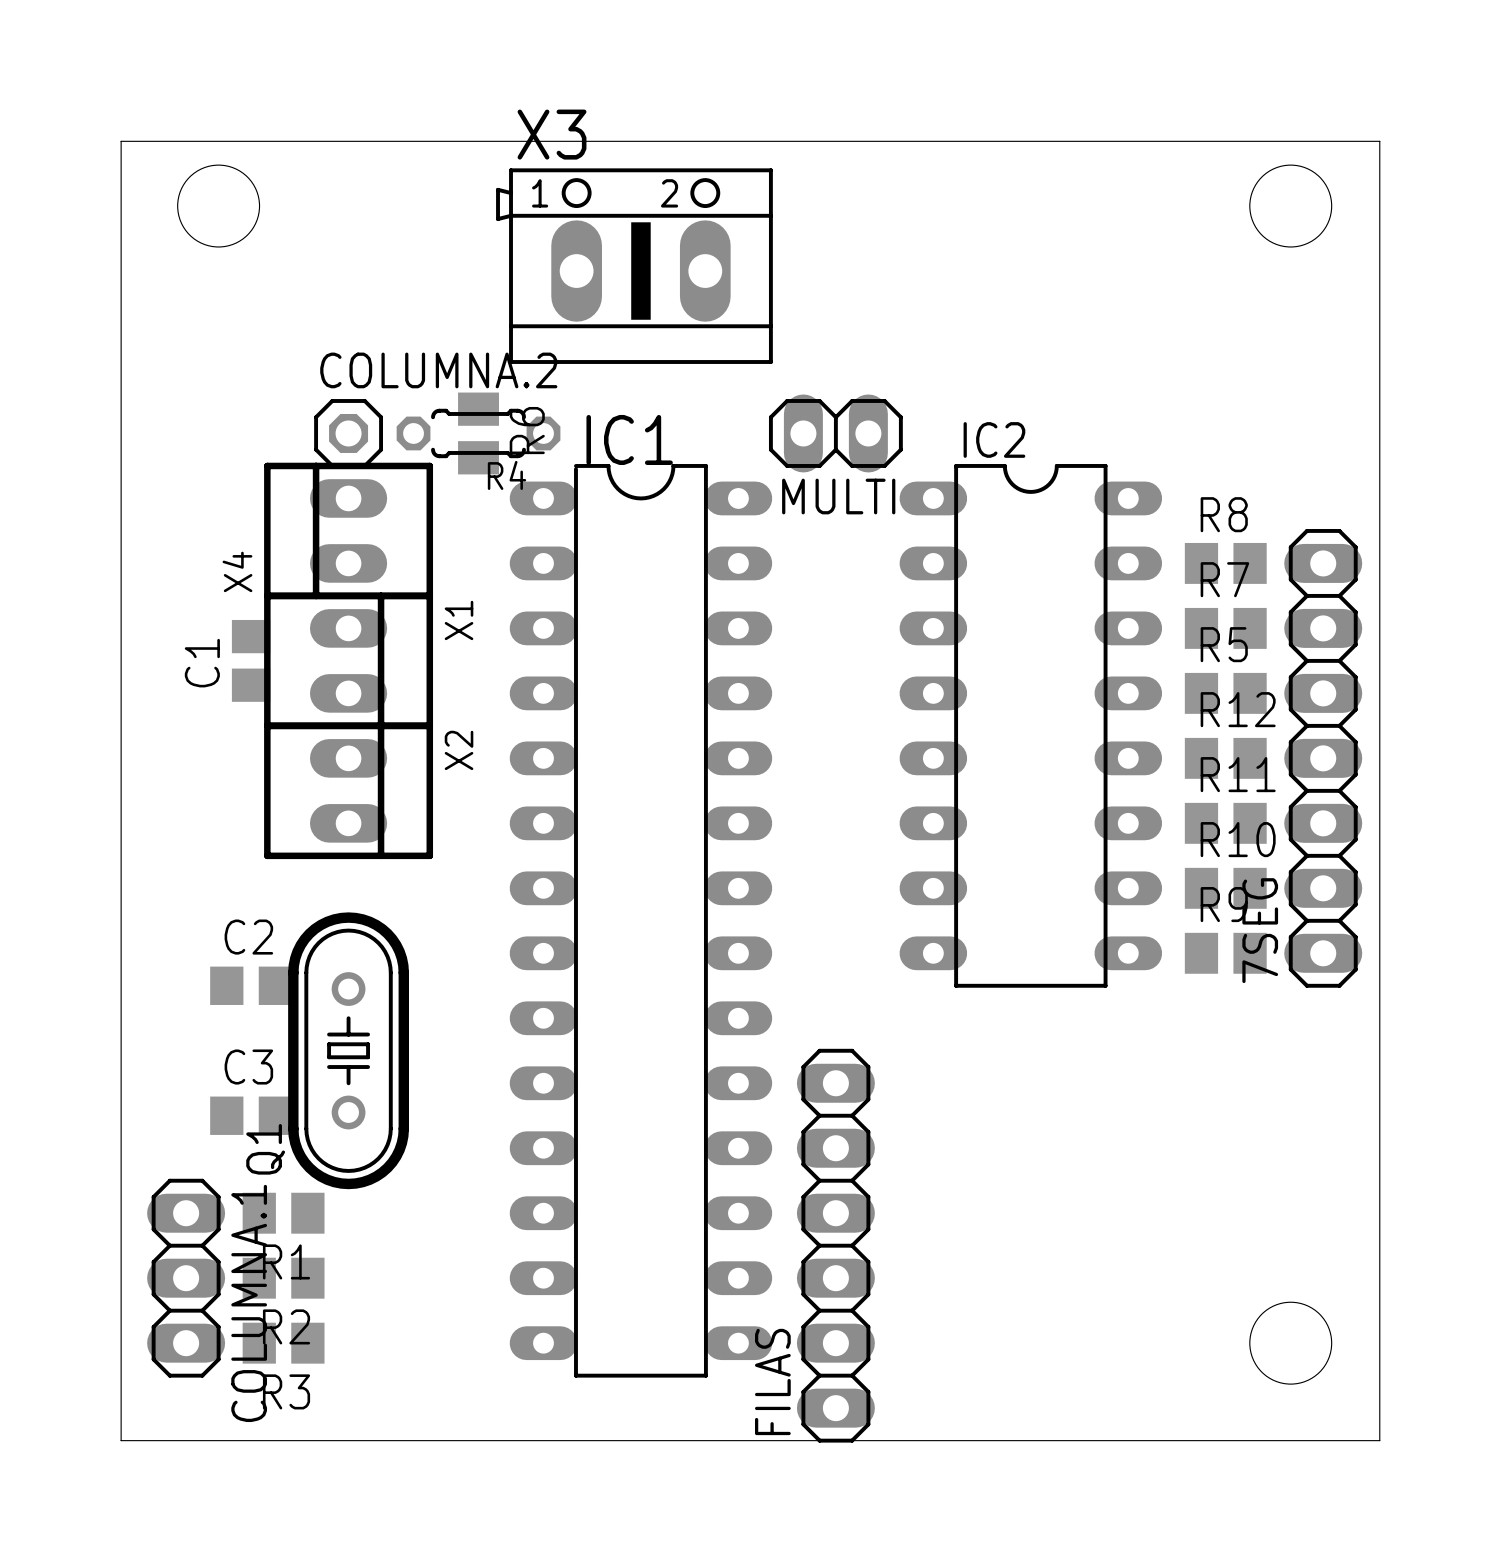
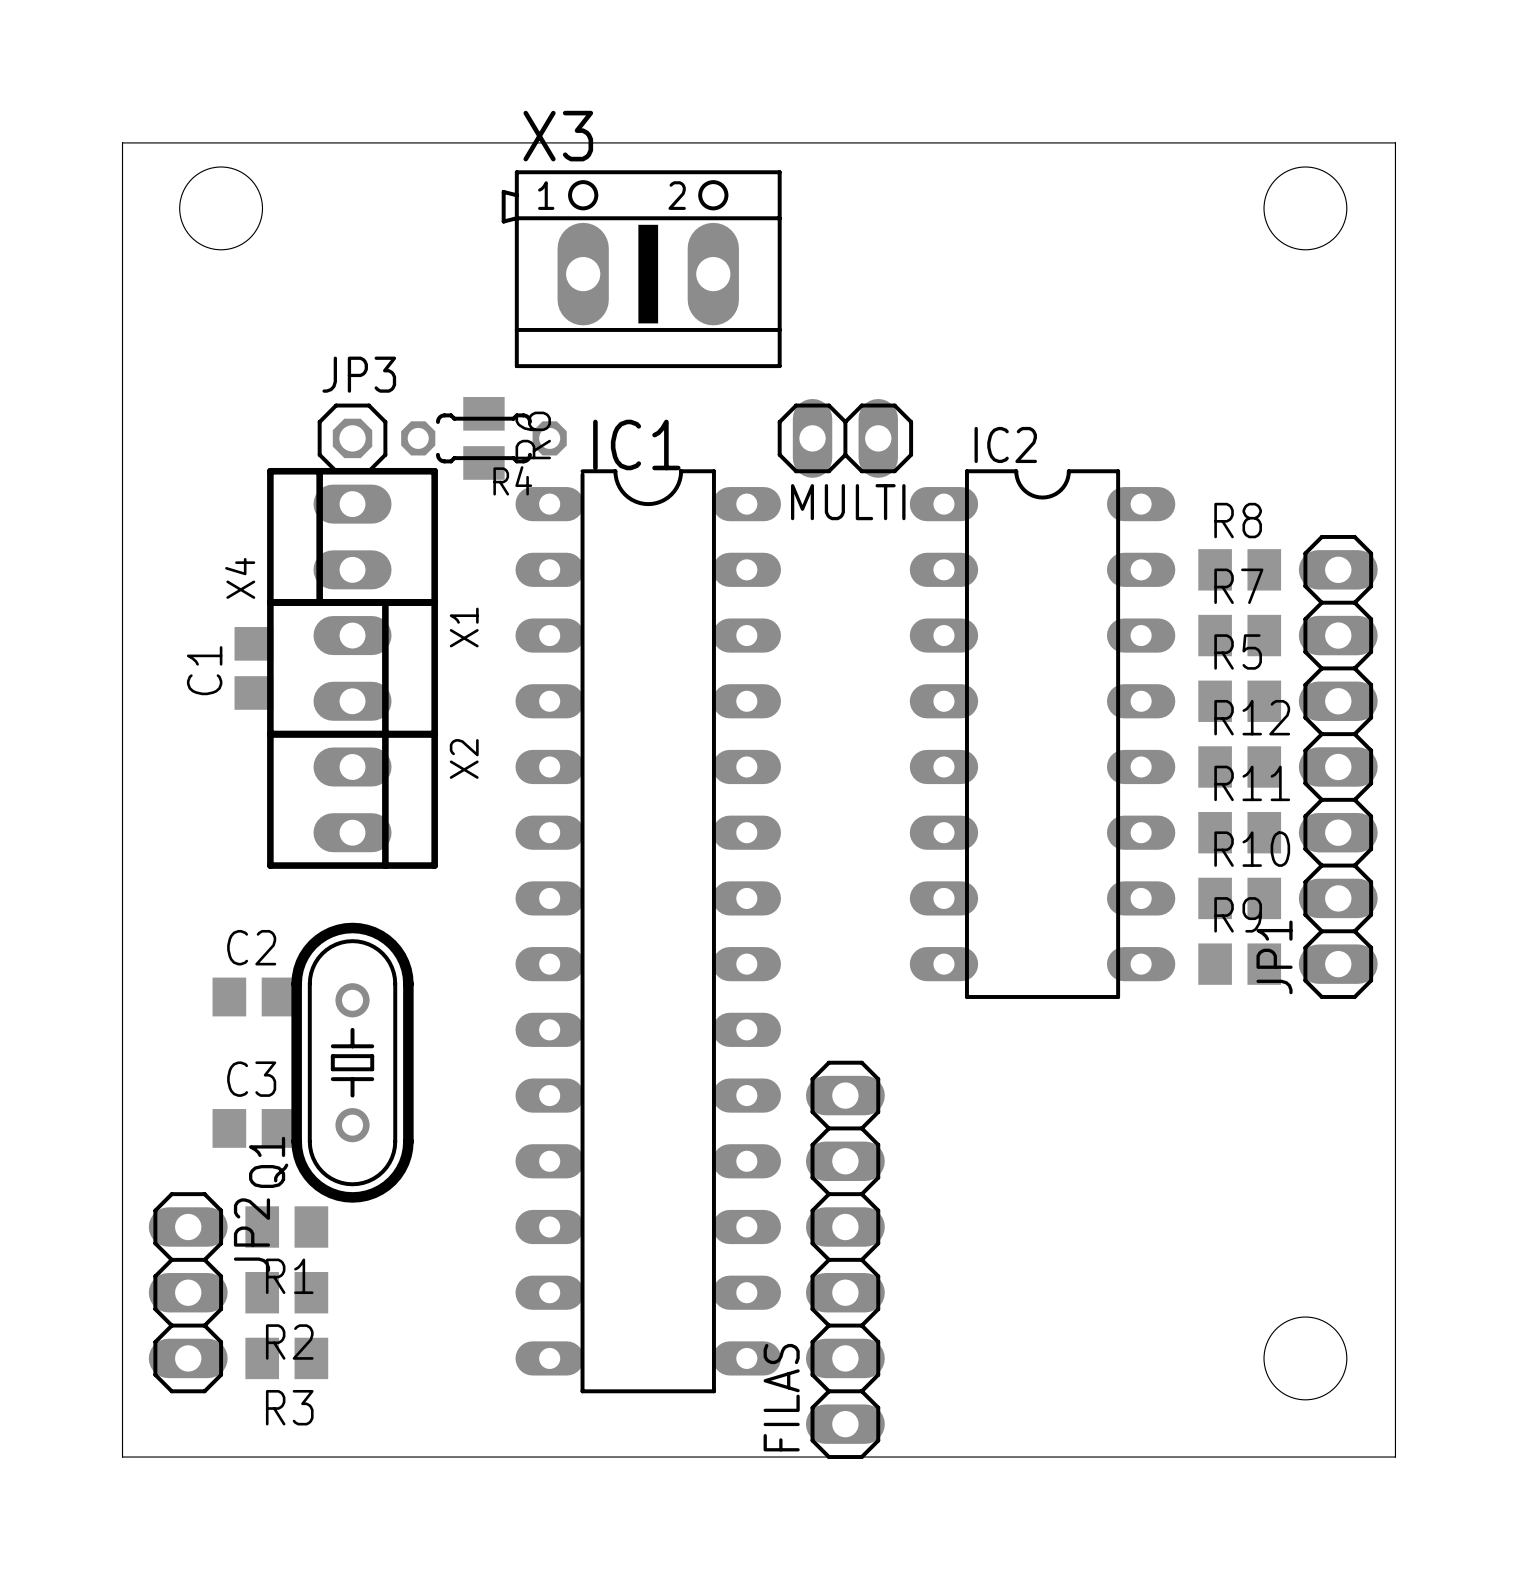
COLUMNA.2 name: COLUMNA.2 (438, 370) -> JP3 (359, 374)
7SEG name: 7SEG (1260, 930) -> JP1 (1274, 957)
COLUMNA.1 name: COLUMNA.1 (249, 1303) -> JP2 (251, 1235)

